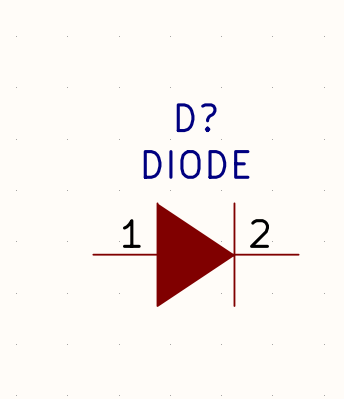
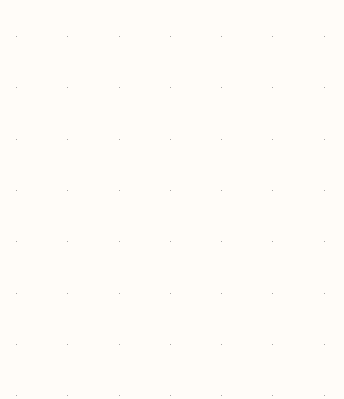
D?: DIODE (195, 254) -> none

